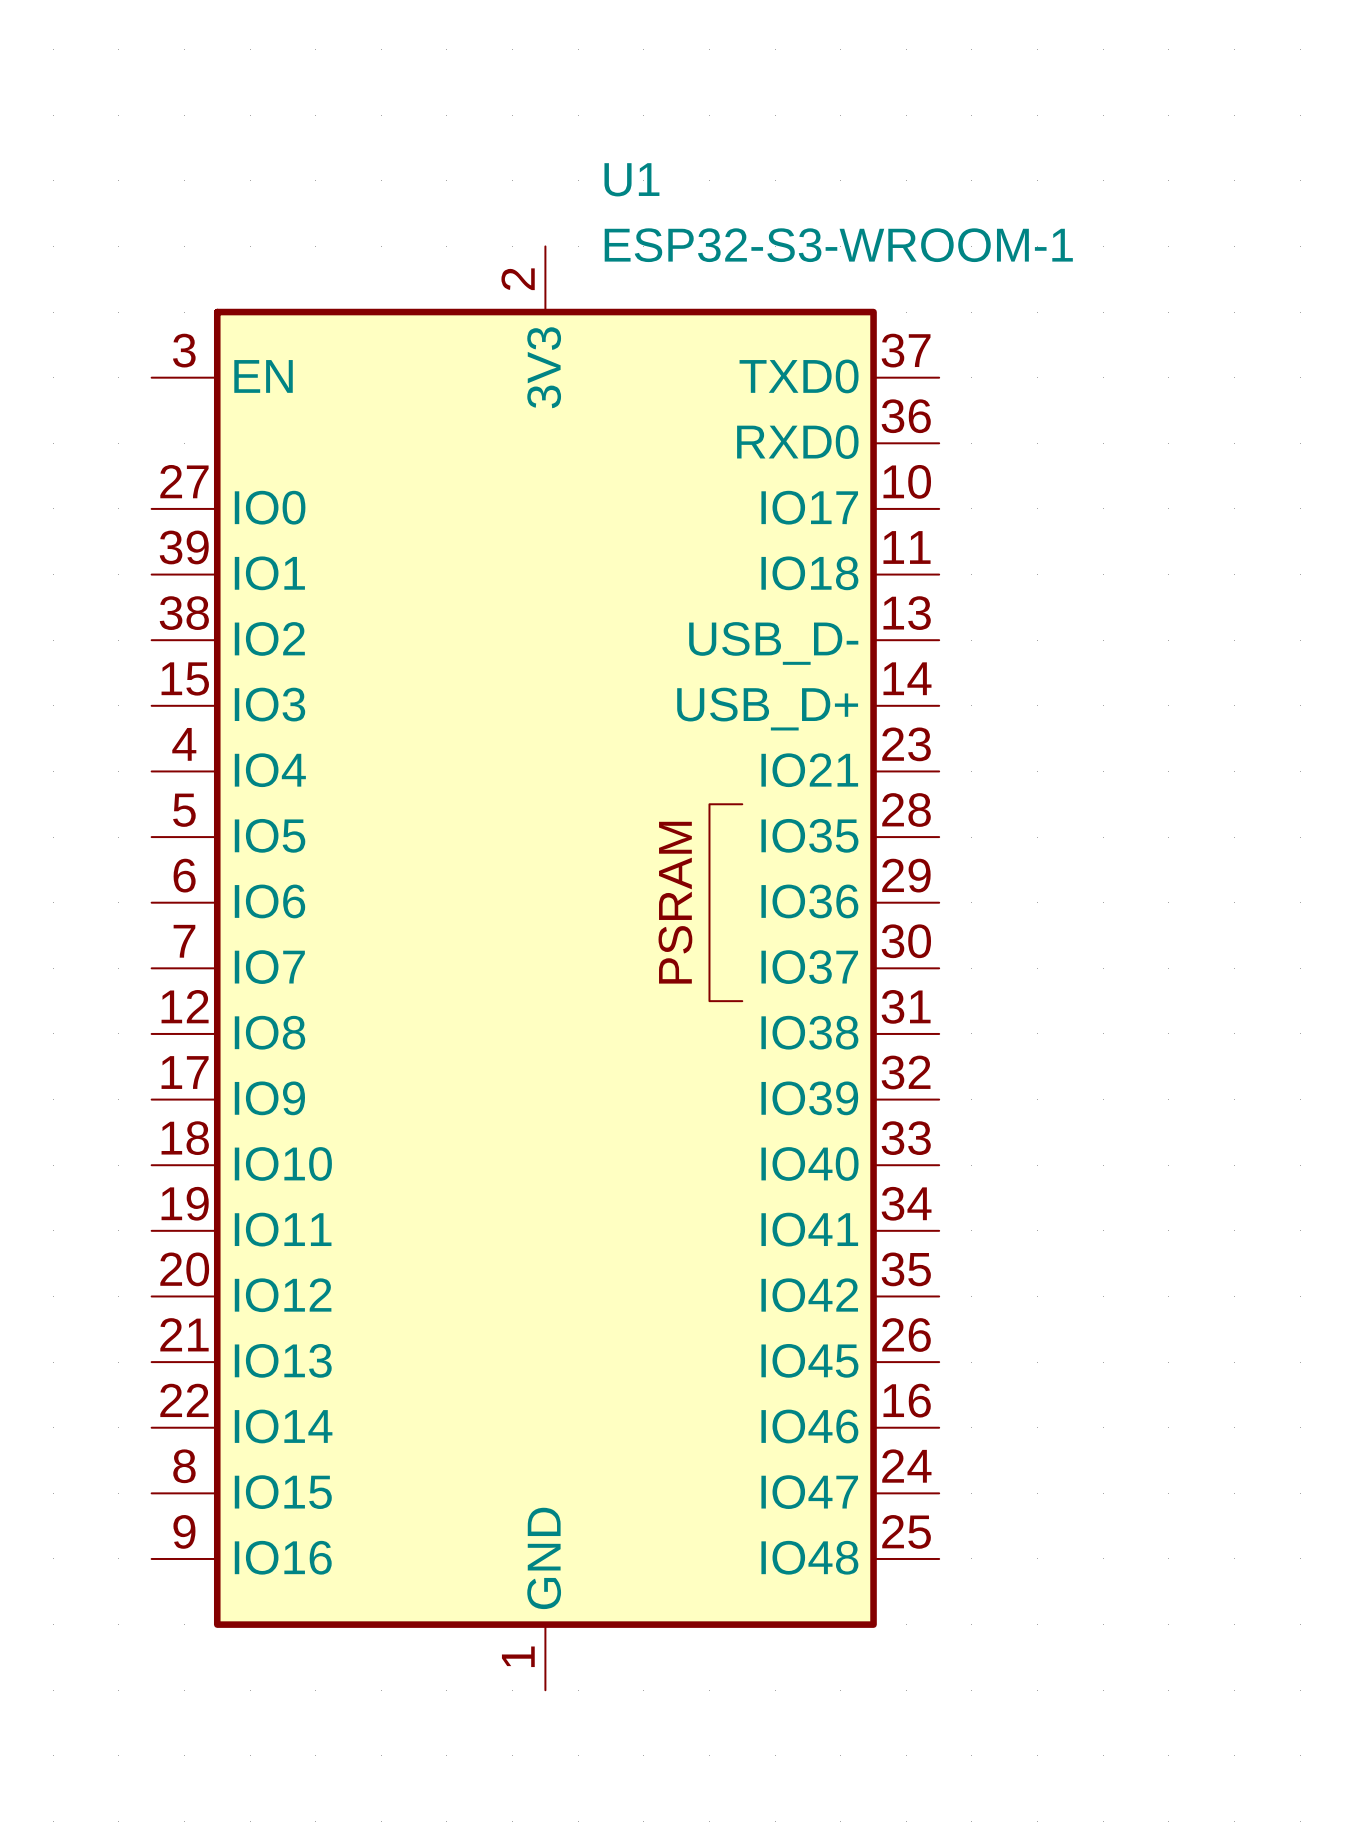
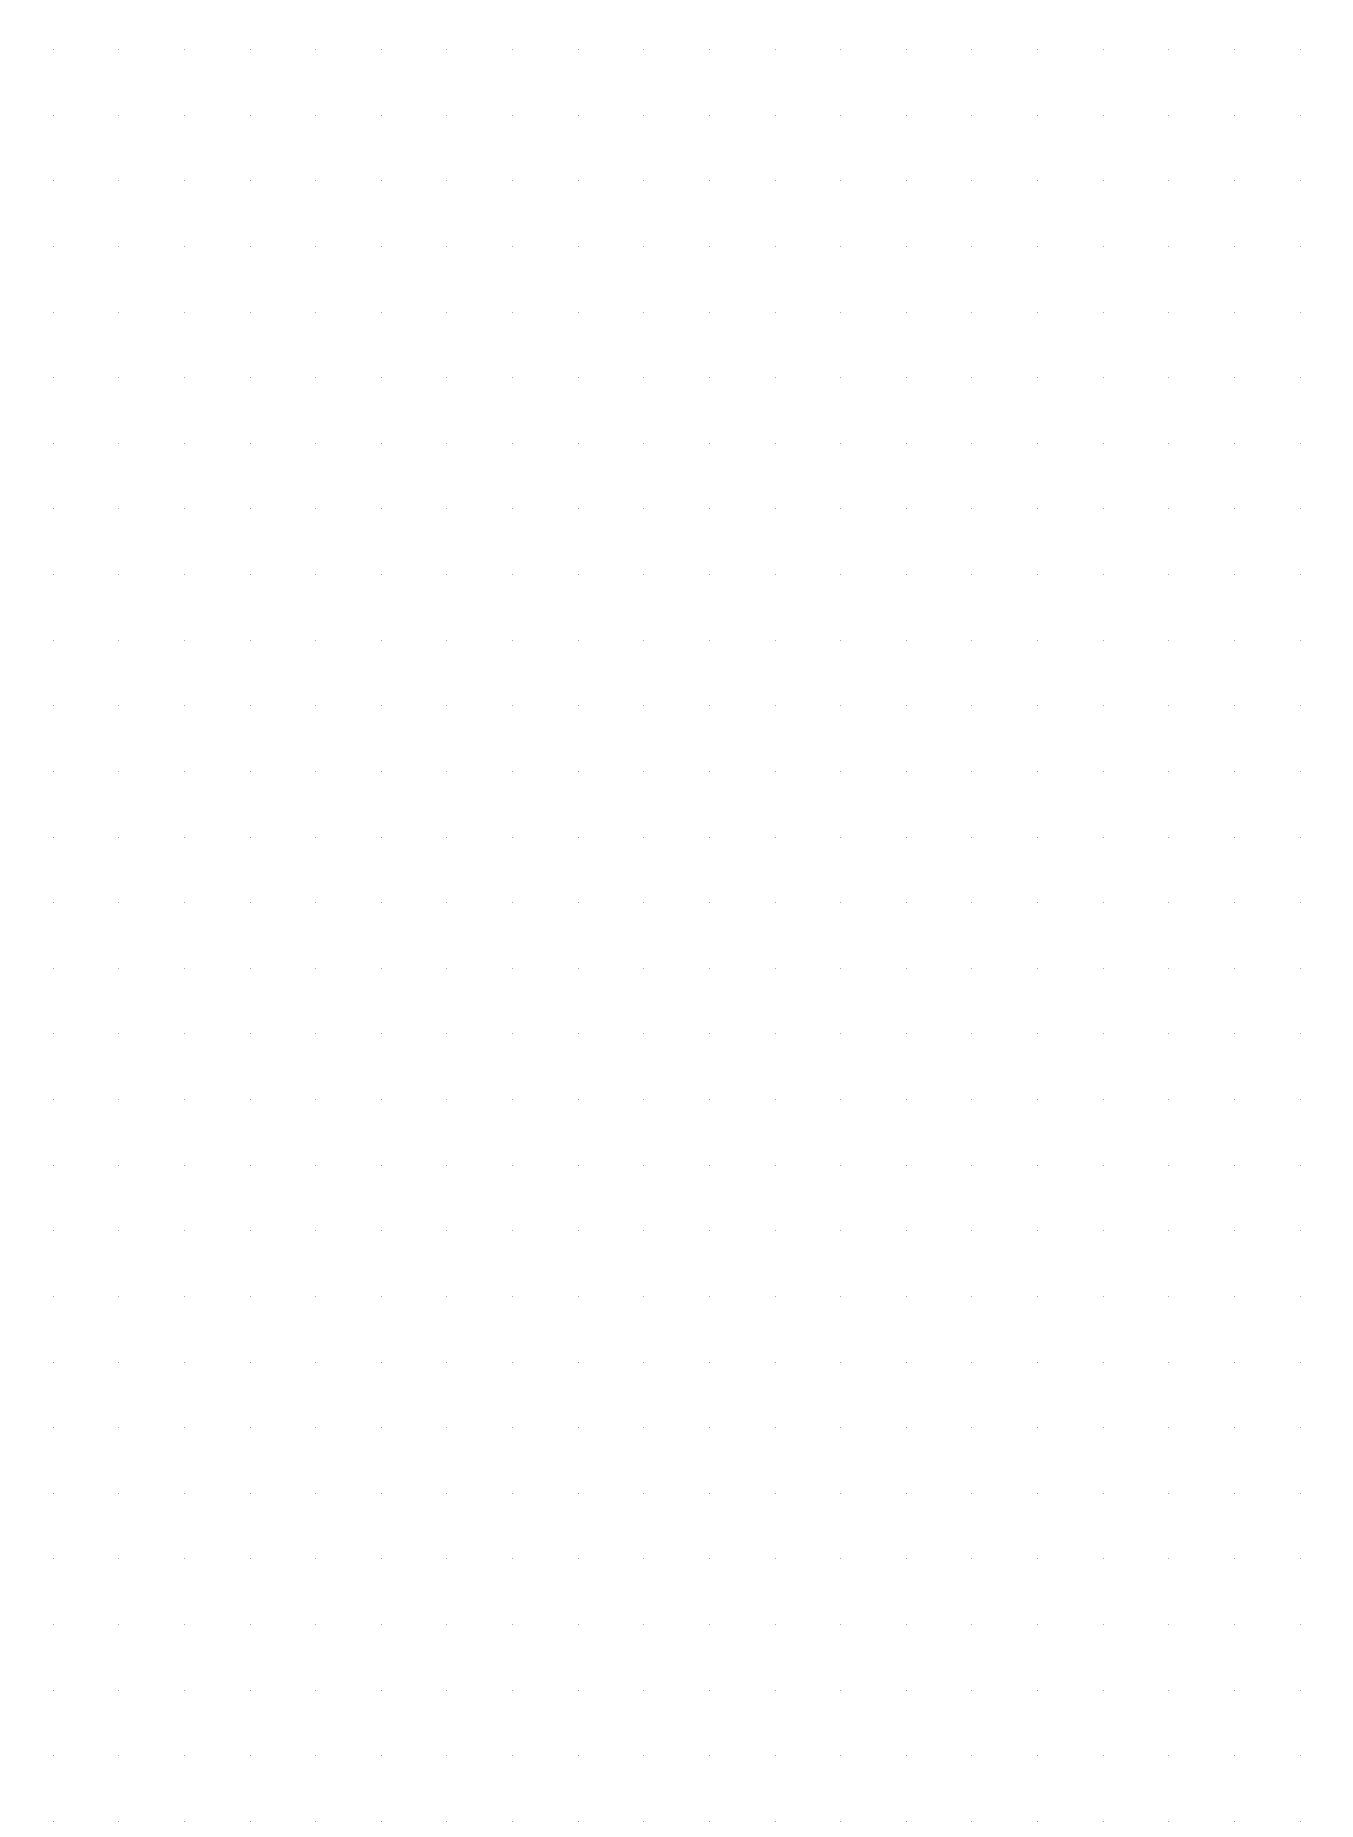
U1: ESP32-S3-WROOM-1 (545, 968) -> none

